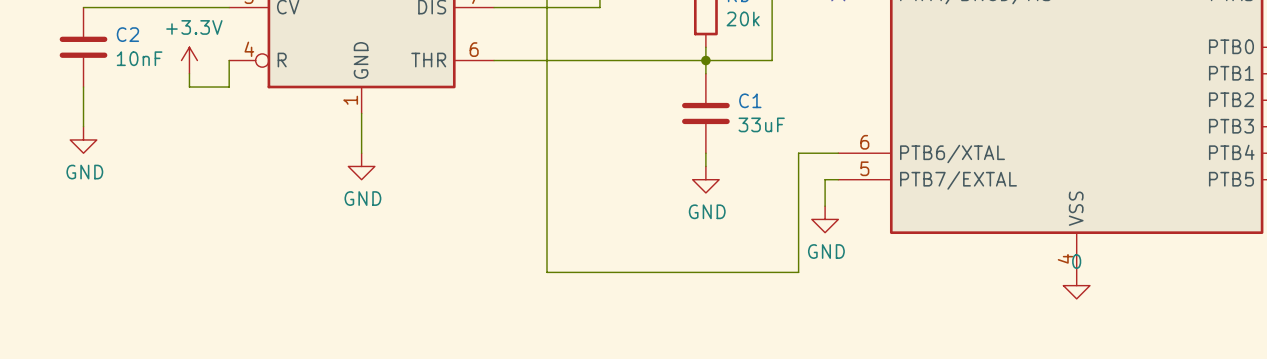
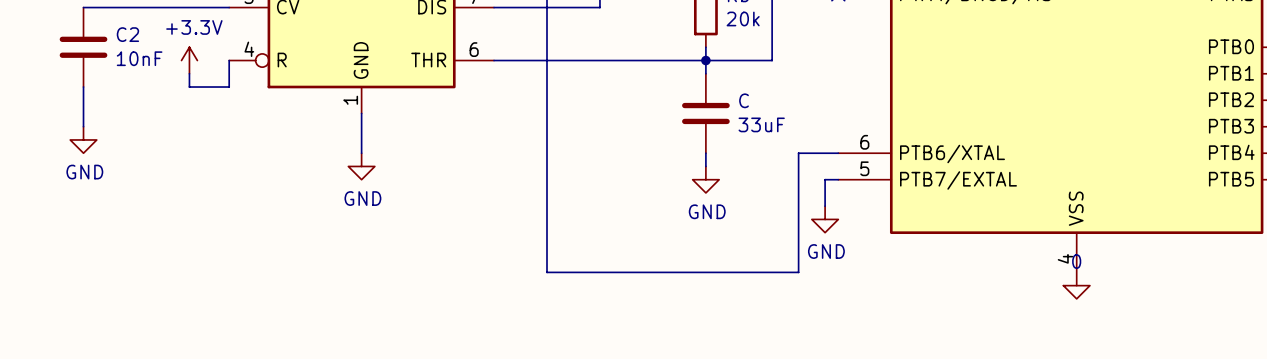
C1 name: C1 (750, 100) -> C (744, 100)

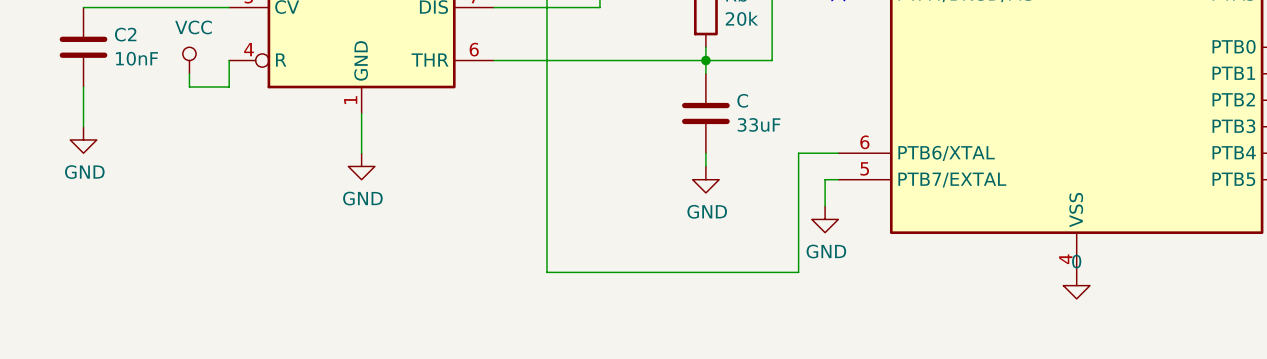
power symbol: +3.3V (189, 60) -> VCC (189, 60)

